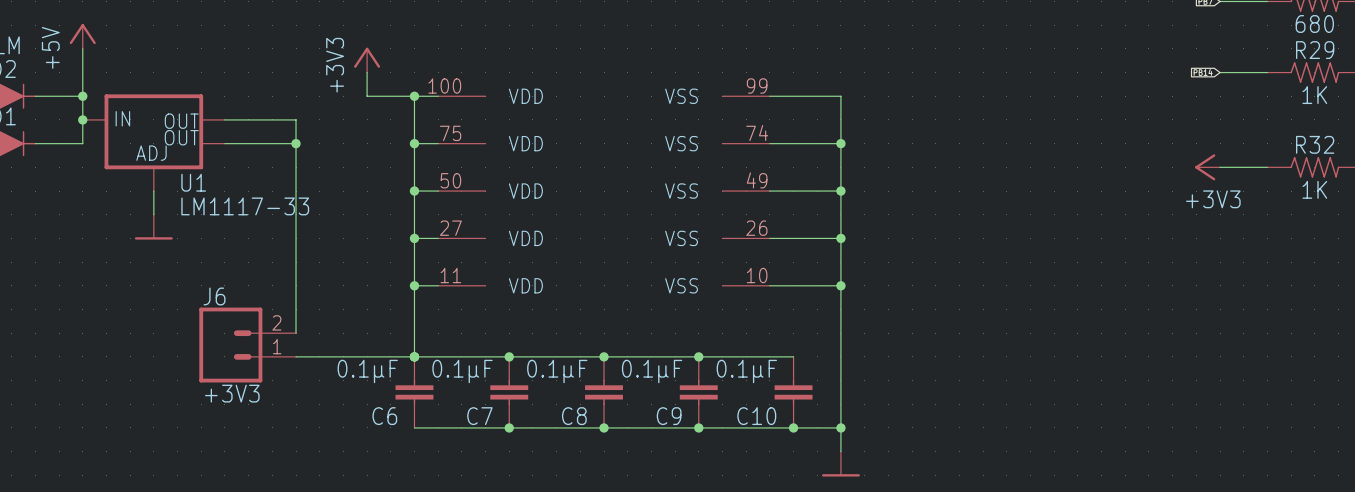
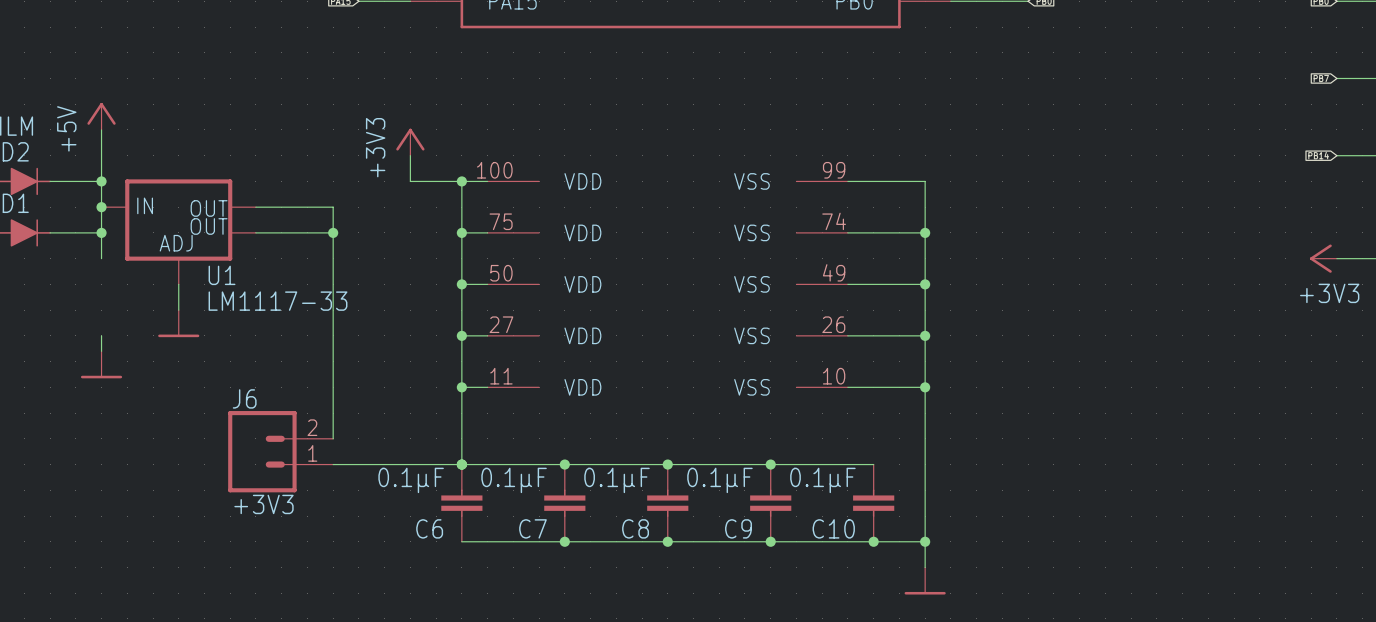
wire: none -> (101, 232) (101, 258)
junction: none -> (101, 232)
wire: none -> (101, 335) (101, 351)
power symbol: none -> (101, 364)

